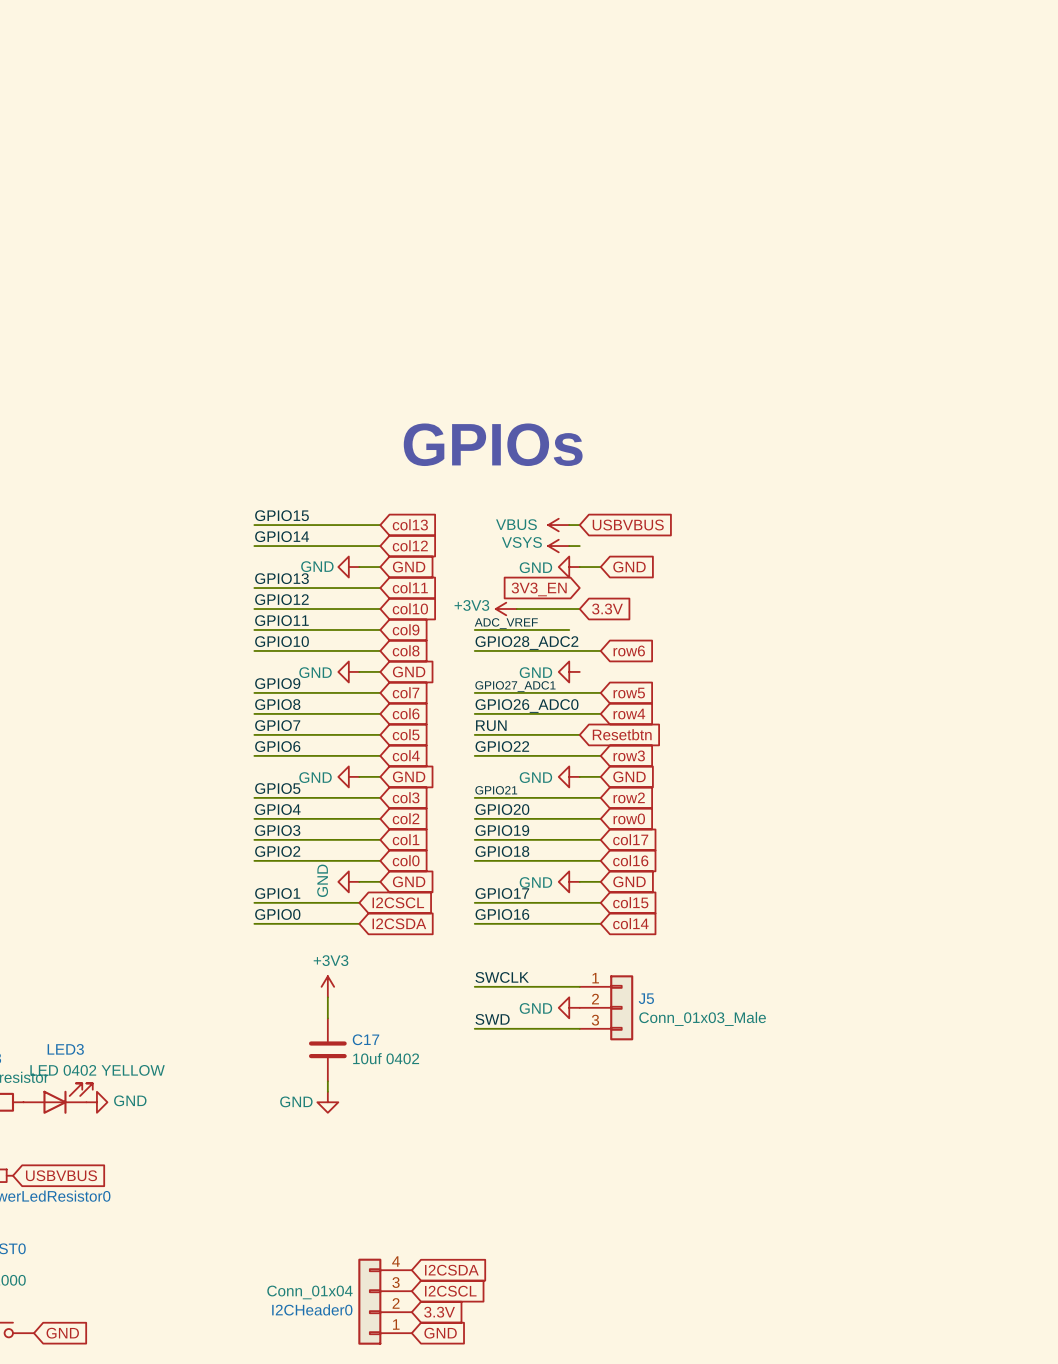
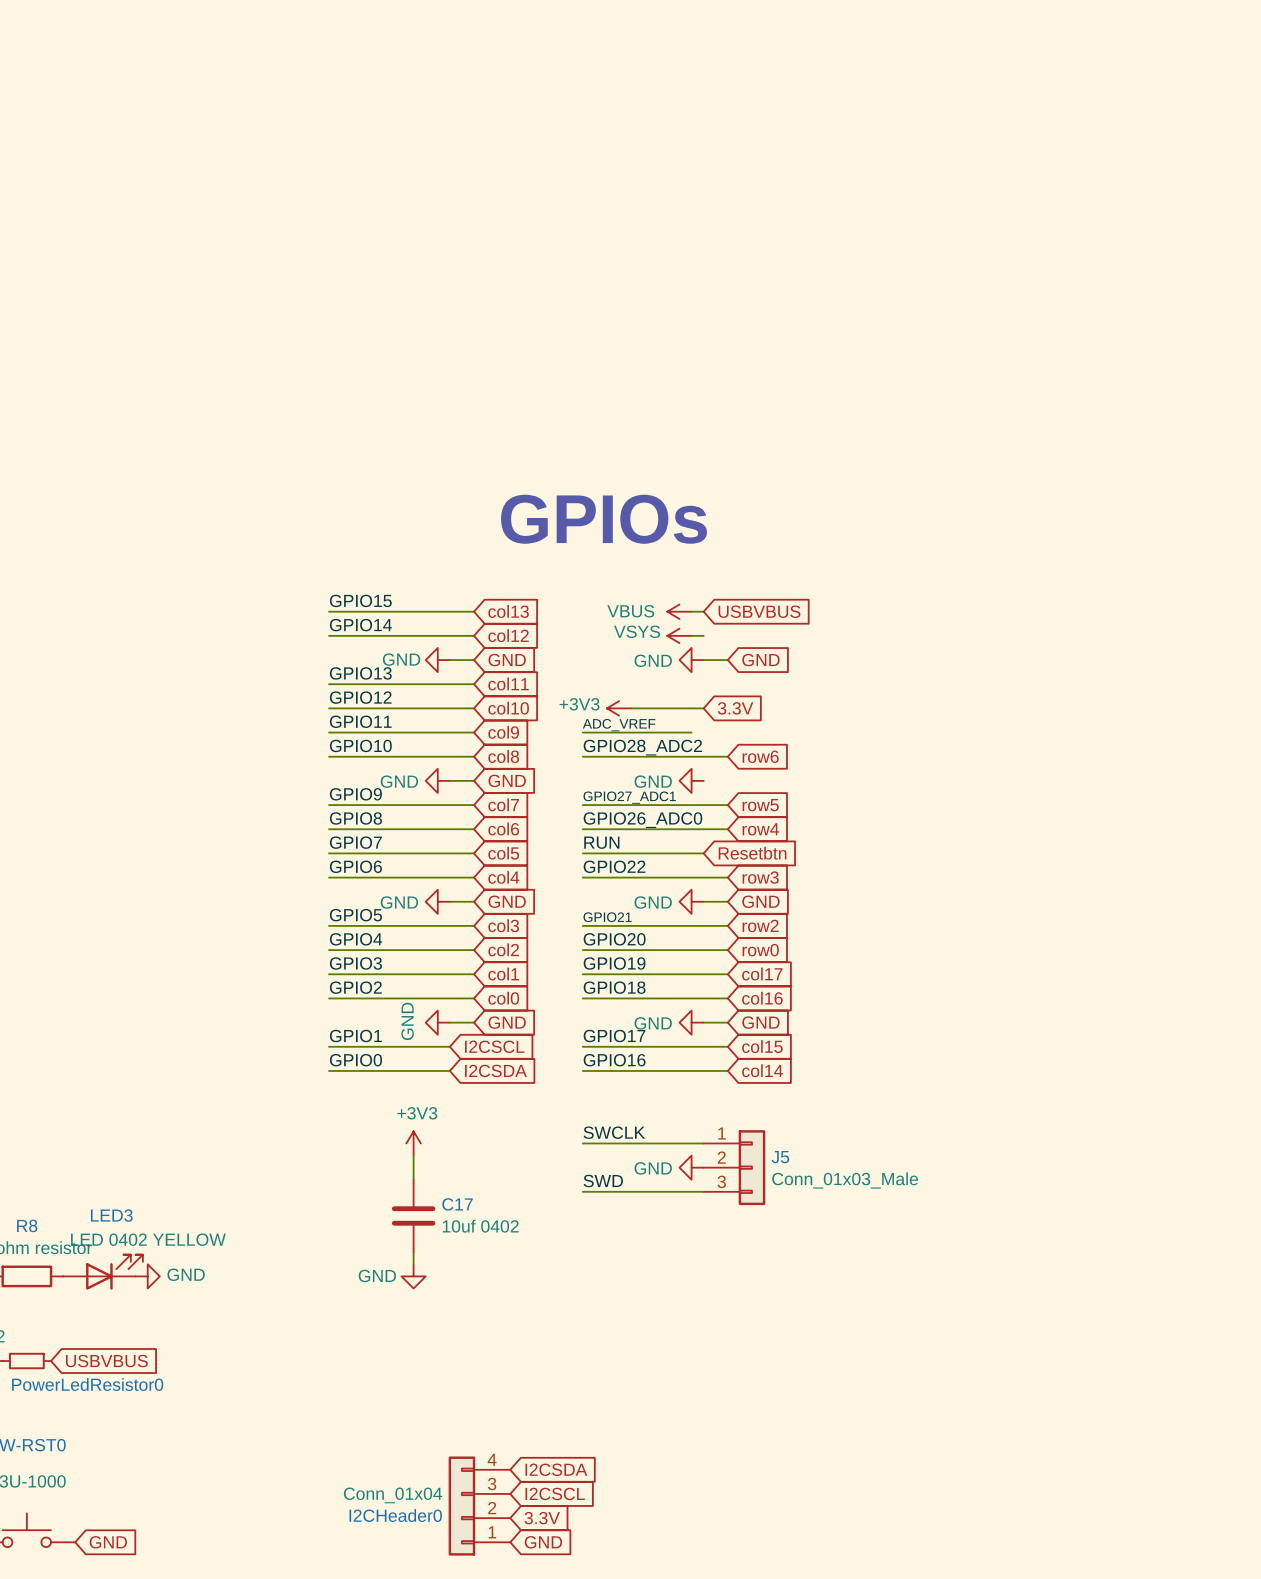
global label: 3V3_EN (539, 589) -> none

